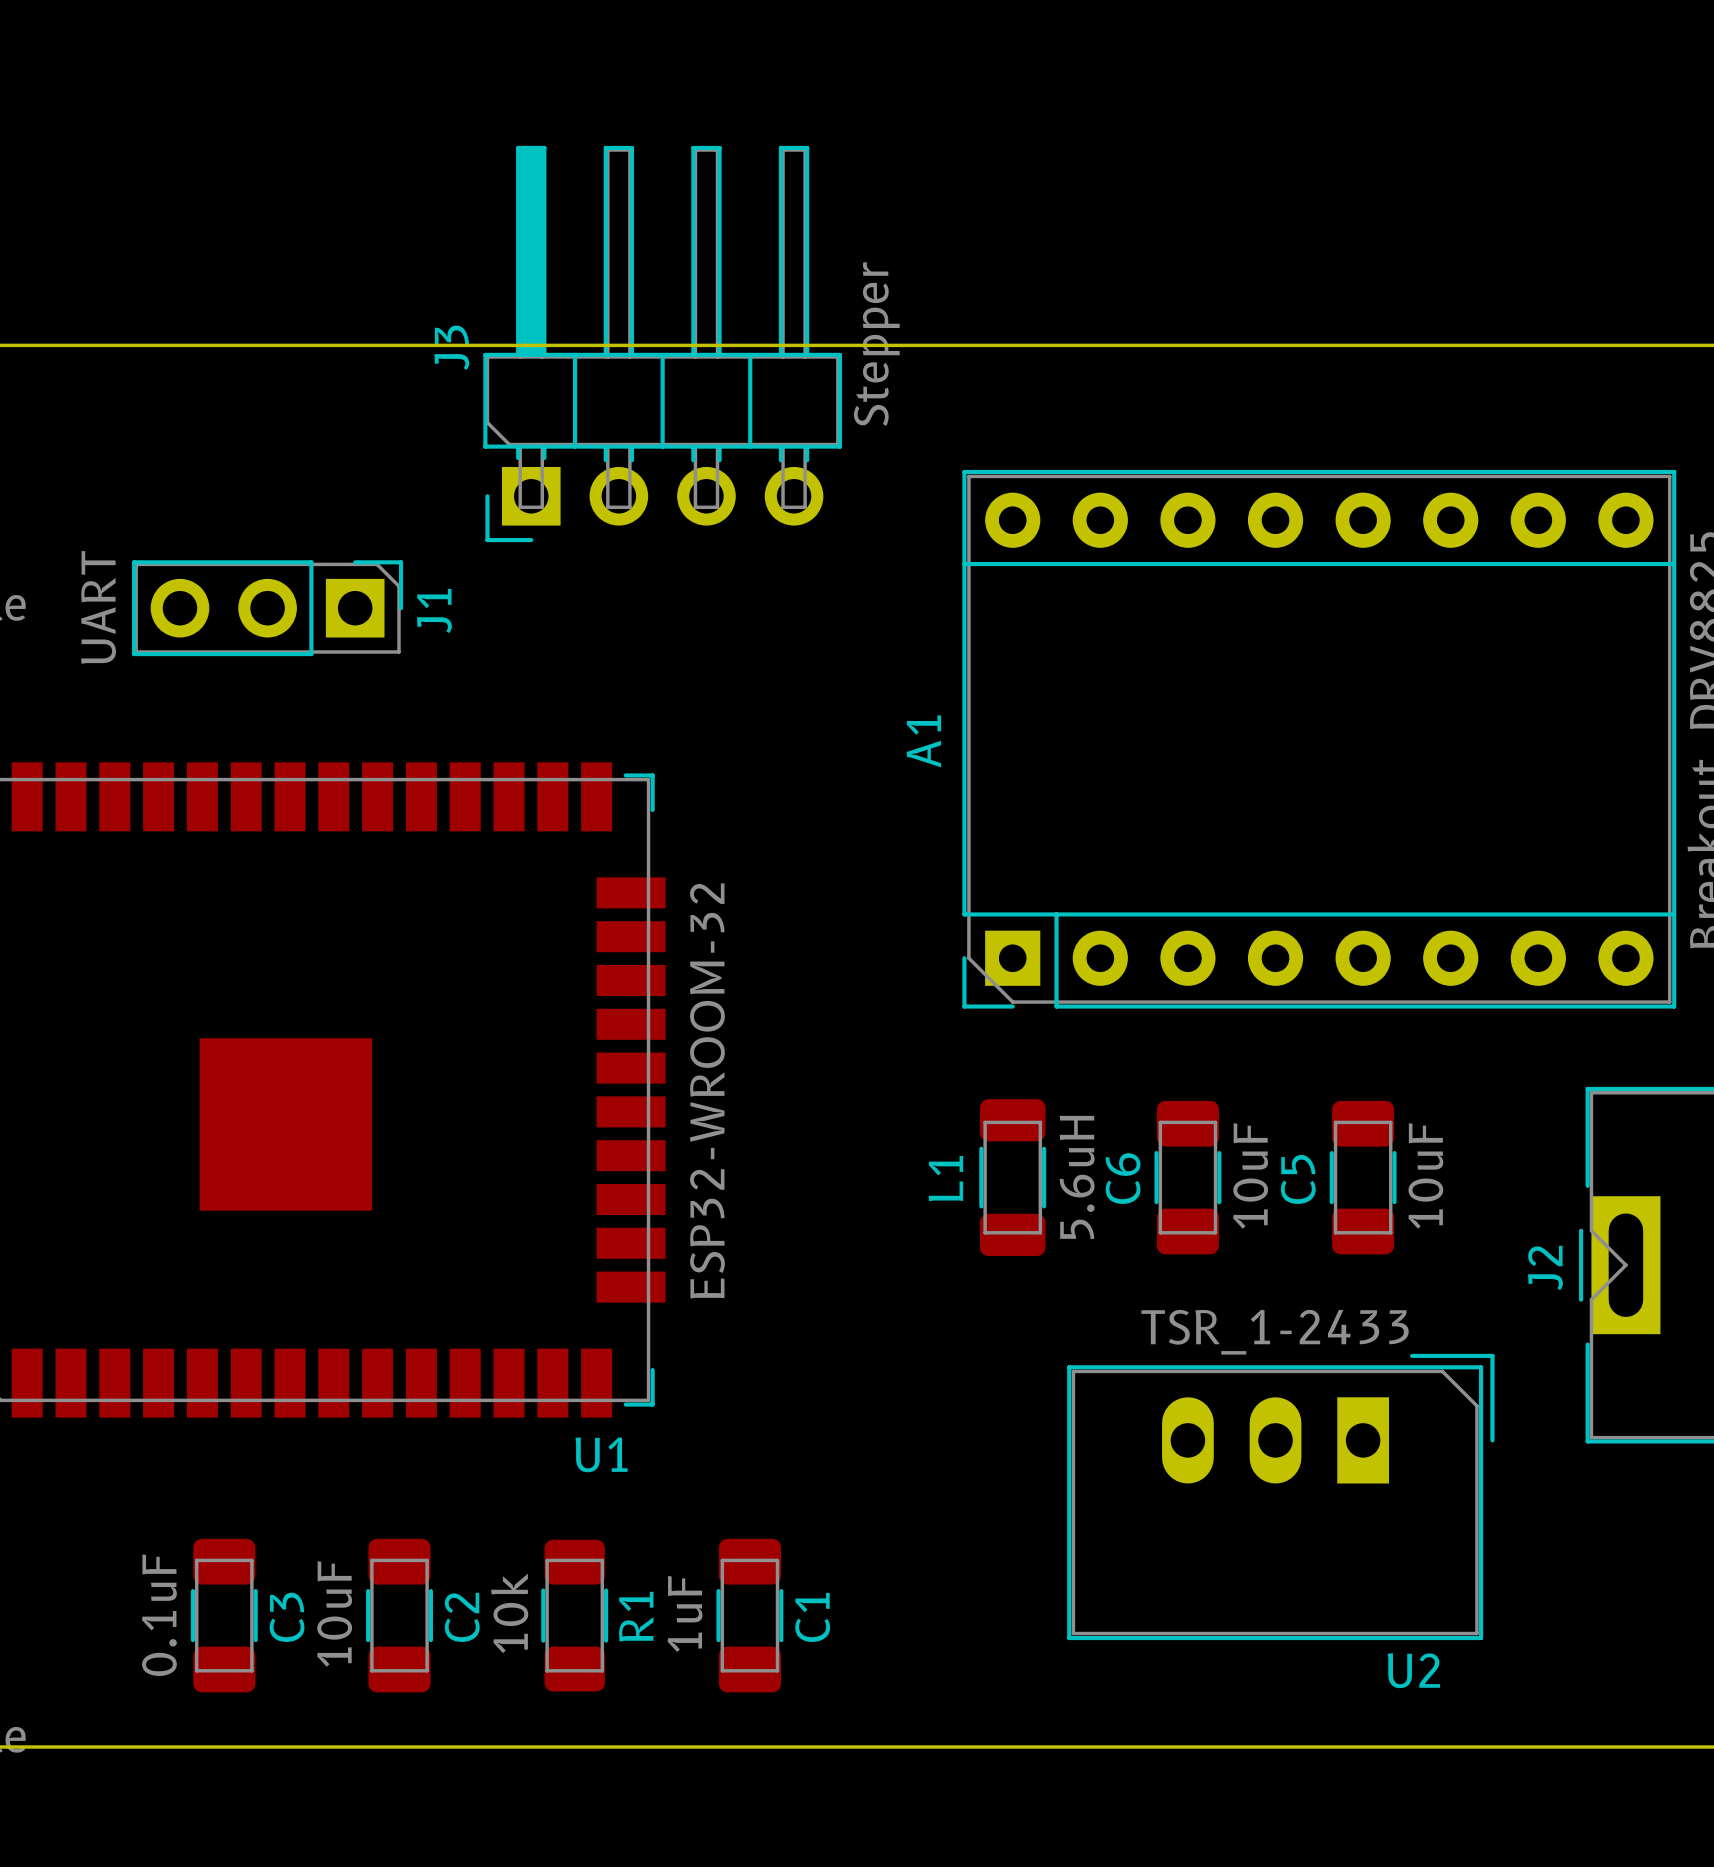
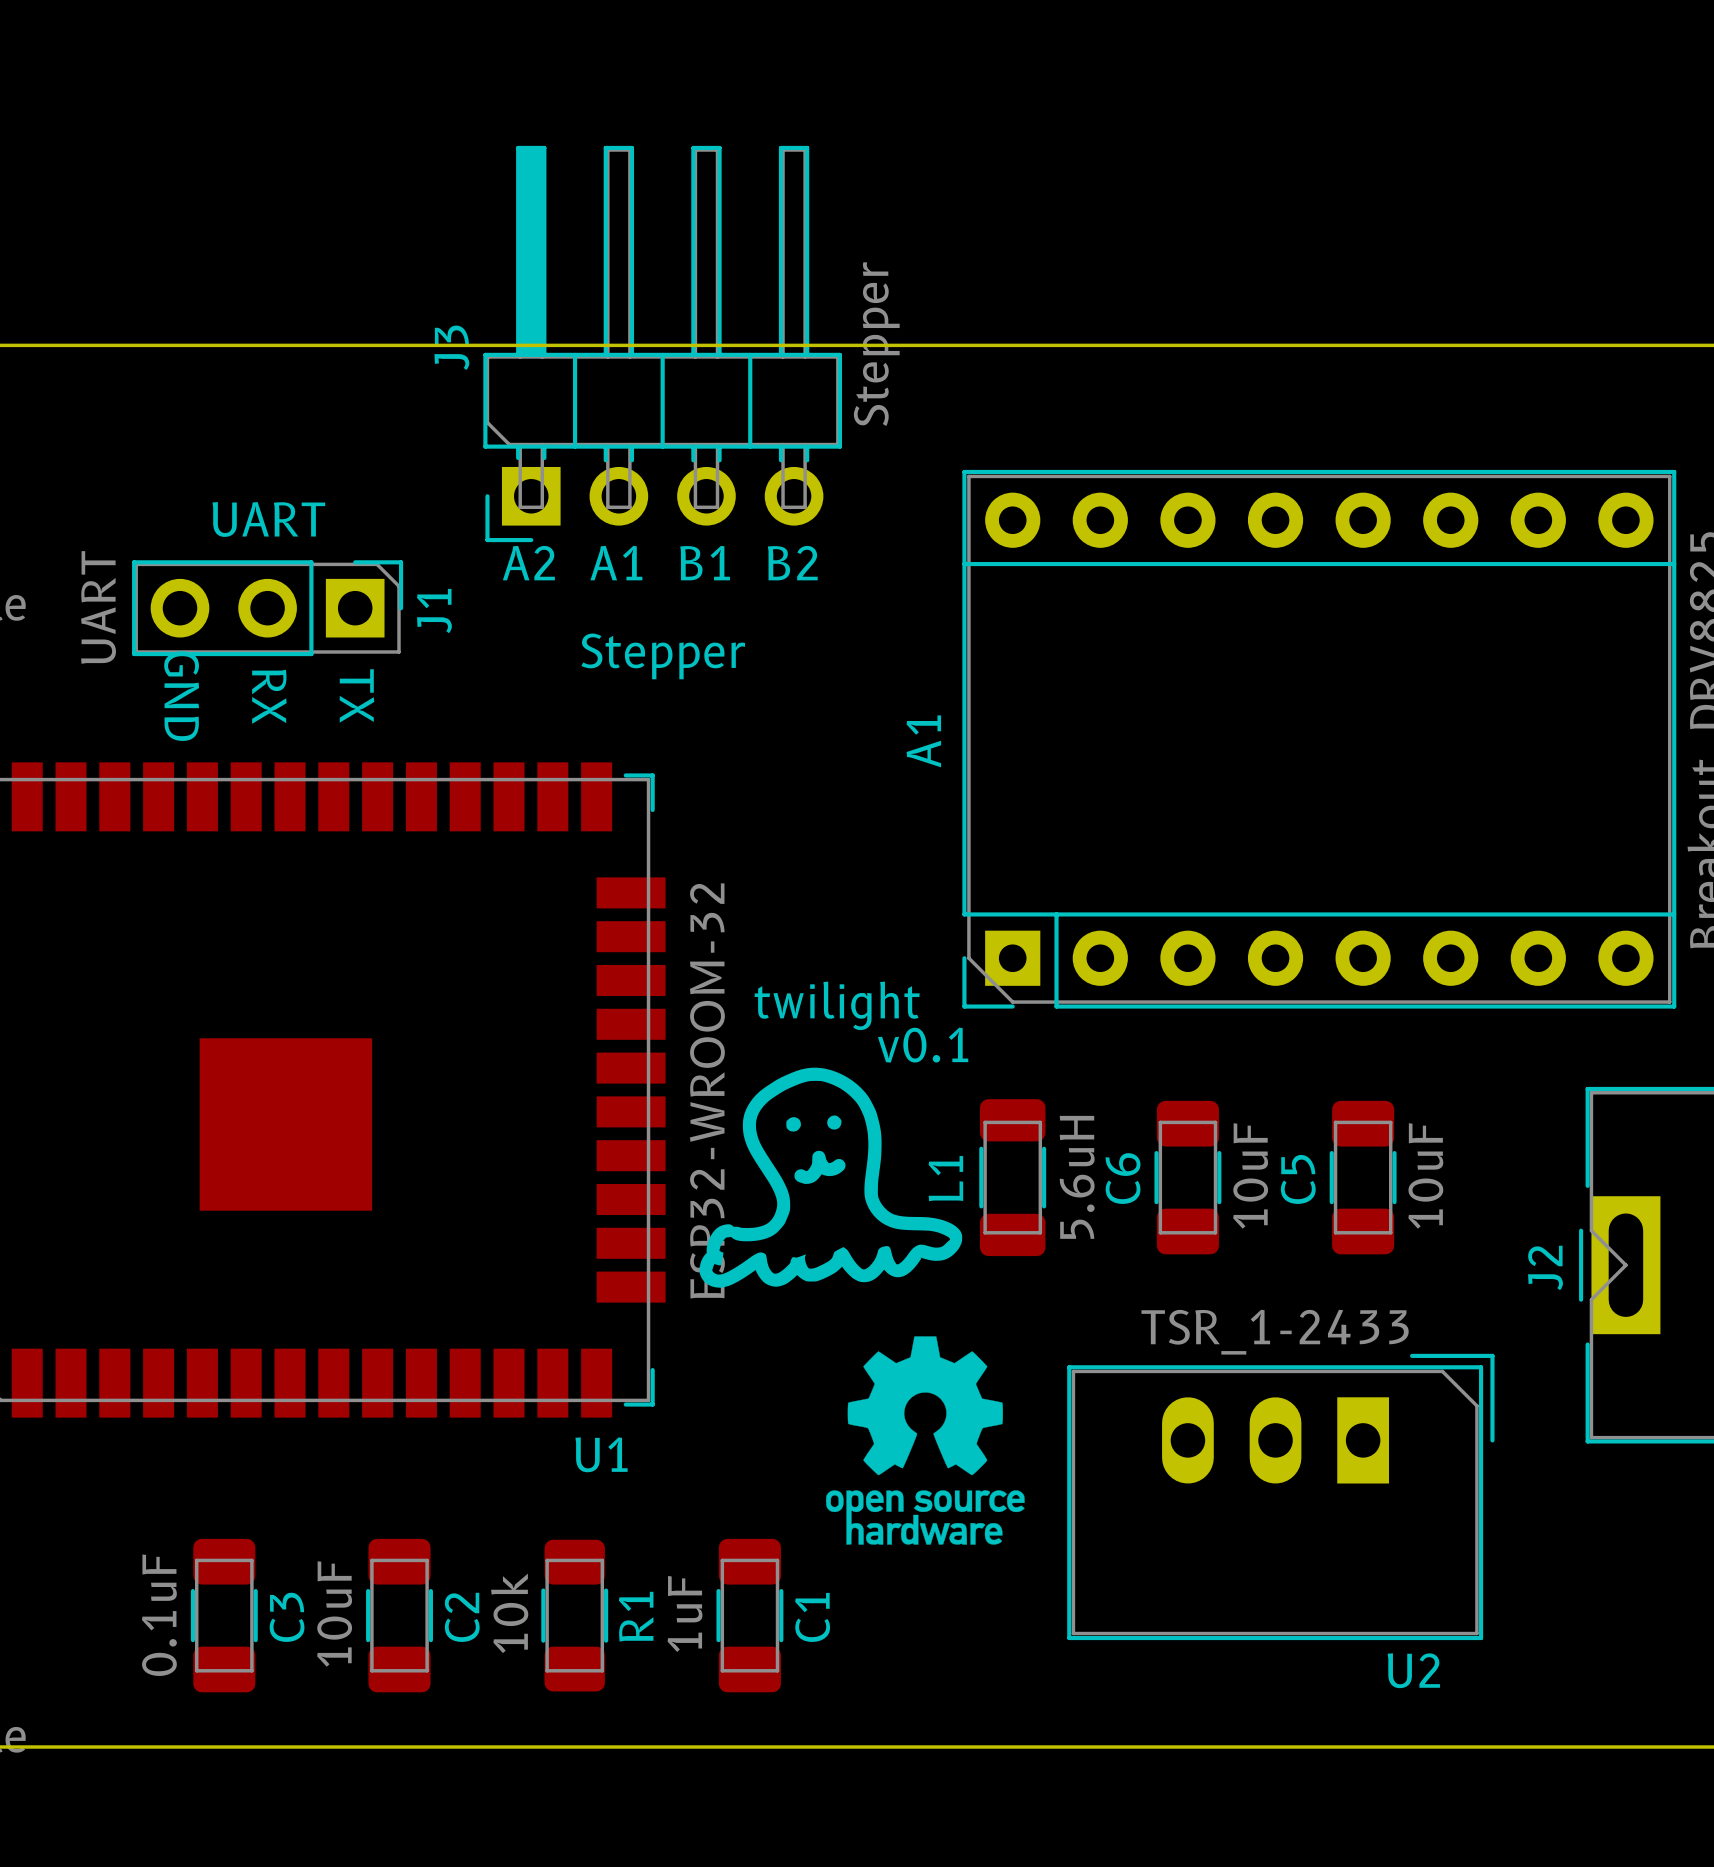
text: none -> UART (268, 519)
text: none -> A2 (528, 563)
text: none -> A1 (616, 563)
text: none -> B1 (705, 563)
text: none -> B2 (792, 563)
text: none -> Stepper (663, 656)
text: none -> TX (357, 695)
text: none -> GND (181, 696)
text: none -> RX (269, 696)
text: none -> twilight (837, 1005)
text: none -> v0.1 (923, 1045)
drawing: none -> [699, 1067, 963, 1288]
drawing: none -> [826, 1336, 1025, 1545]

